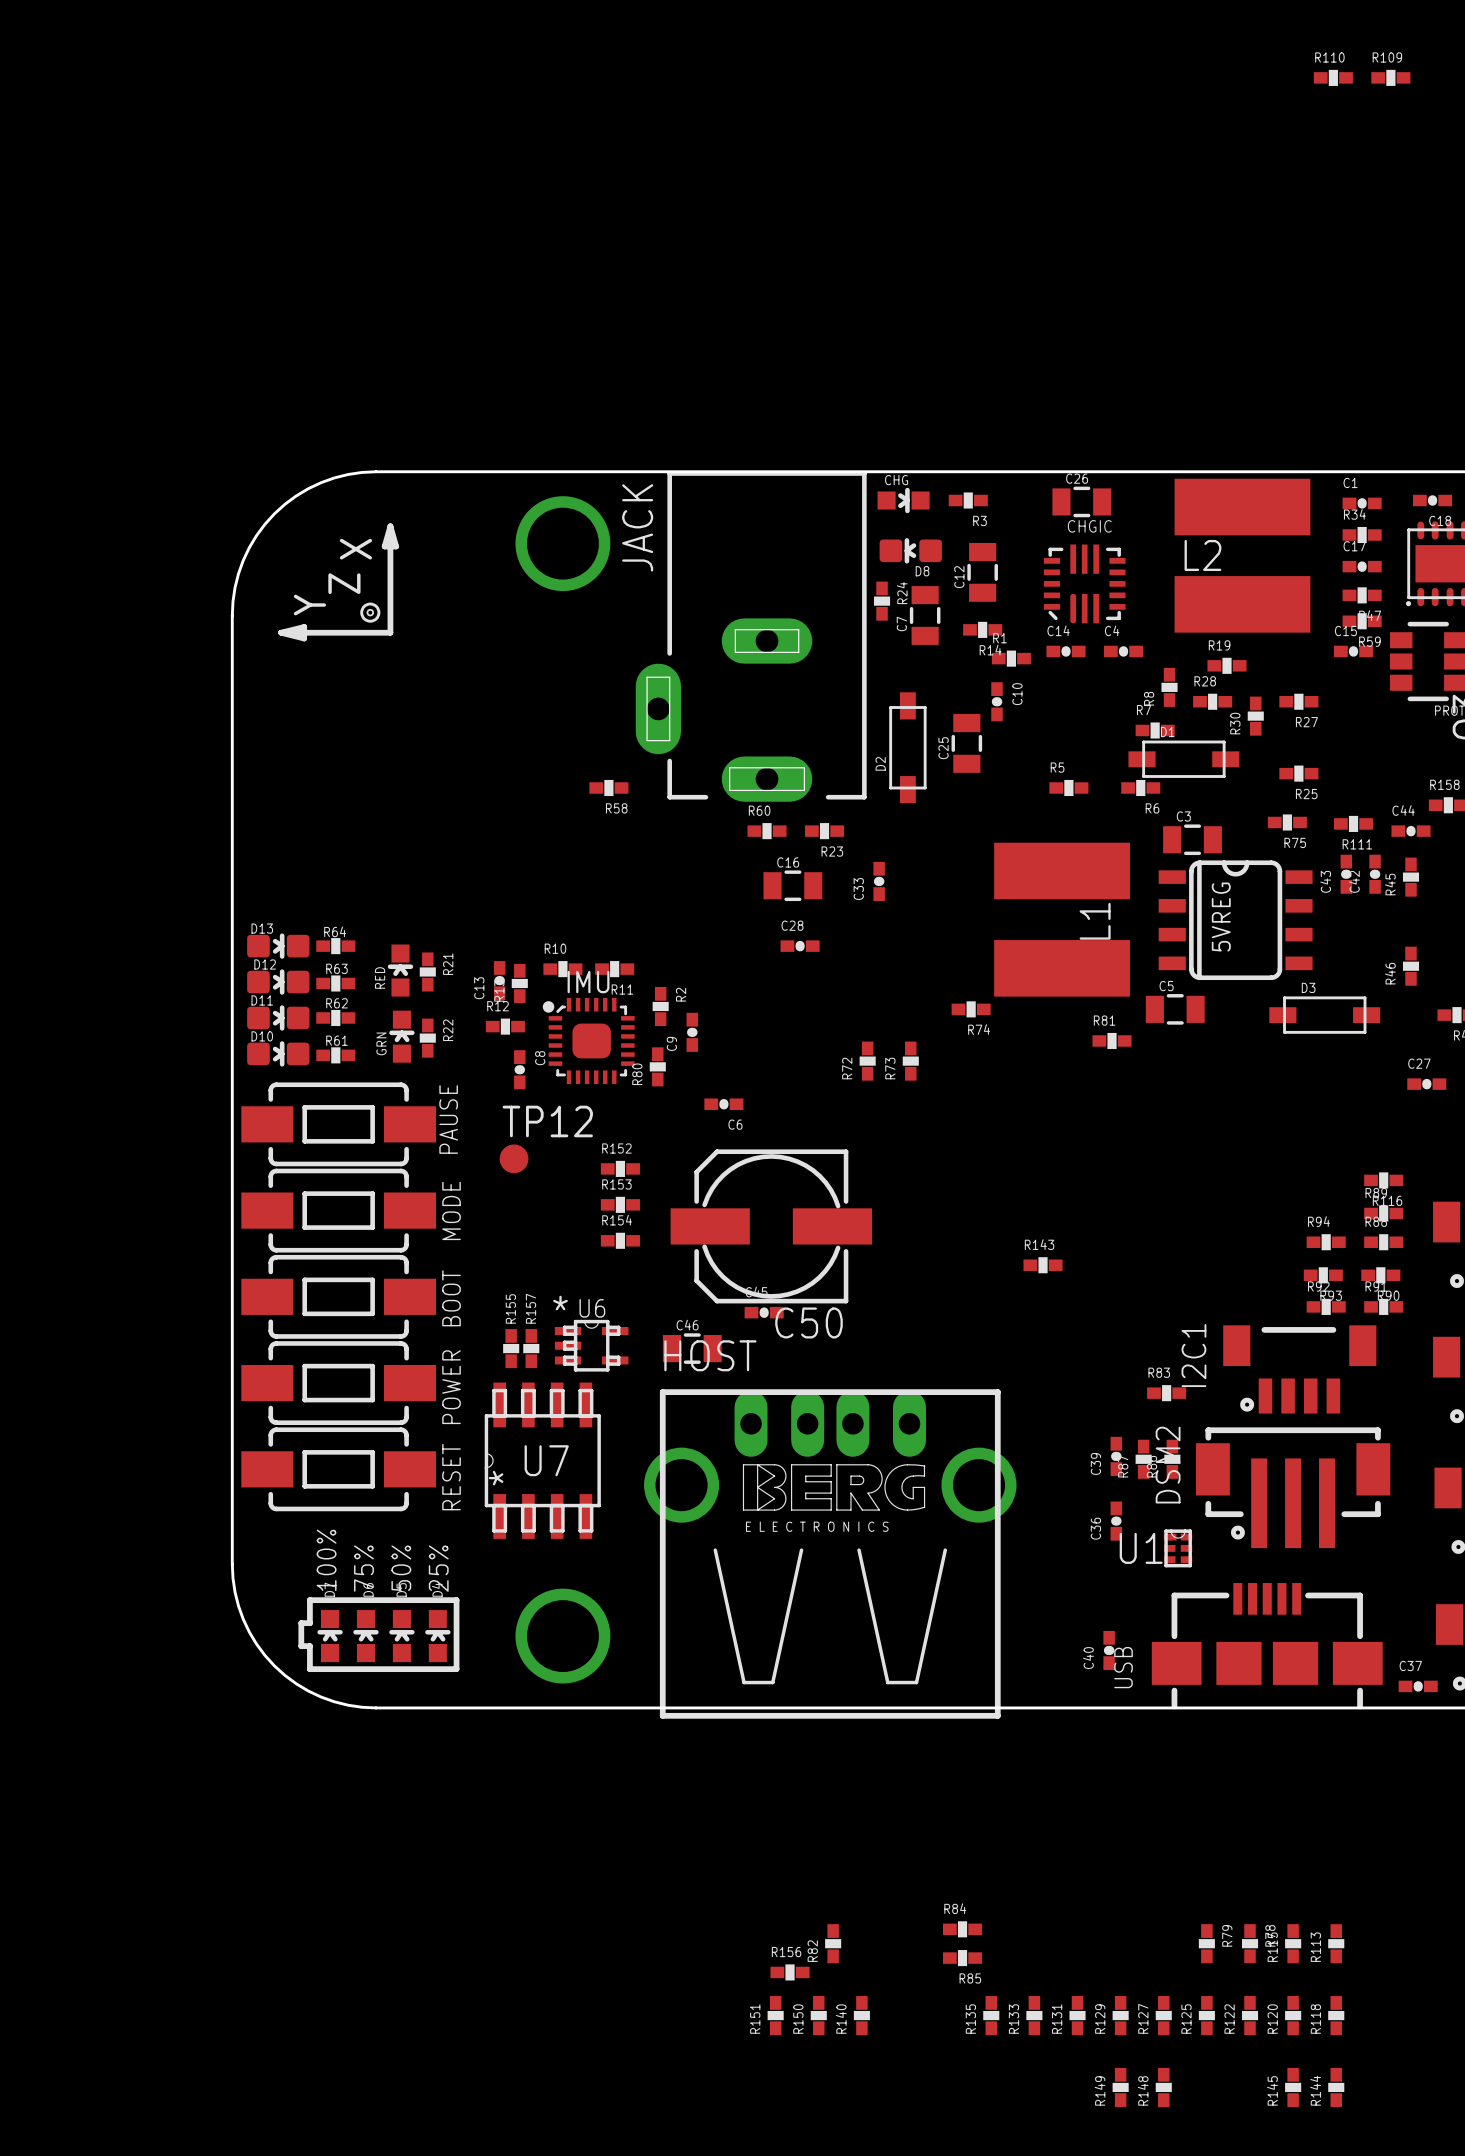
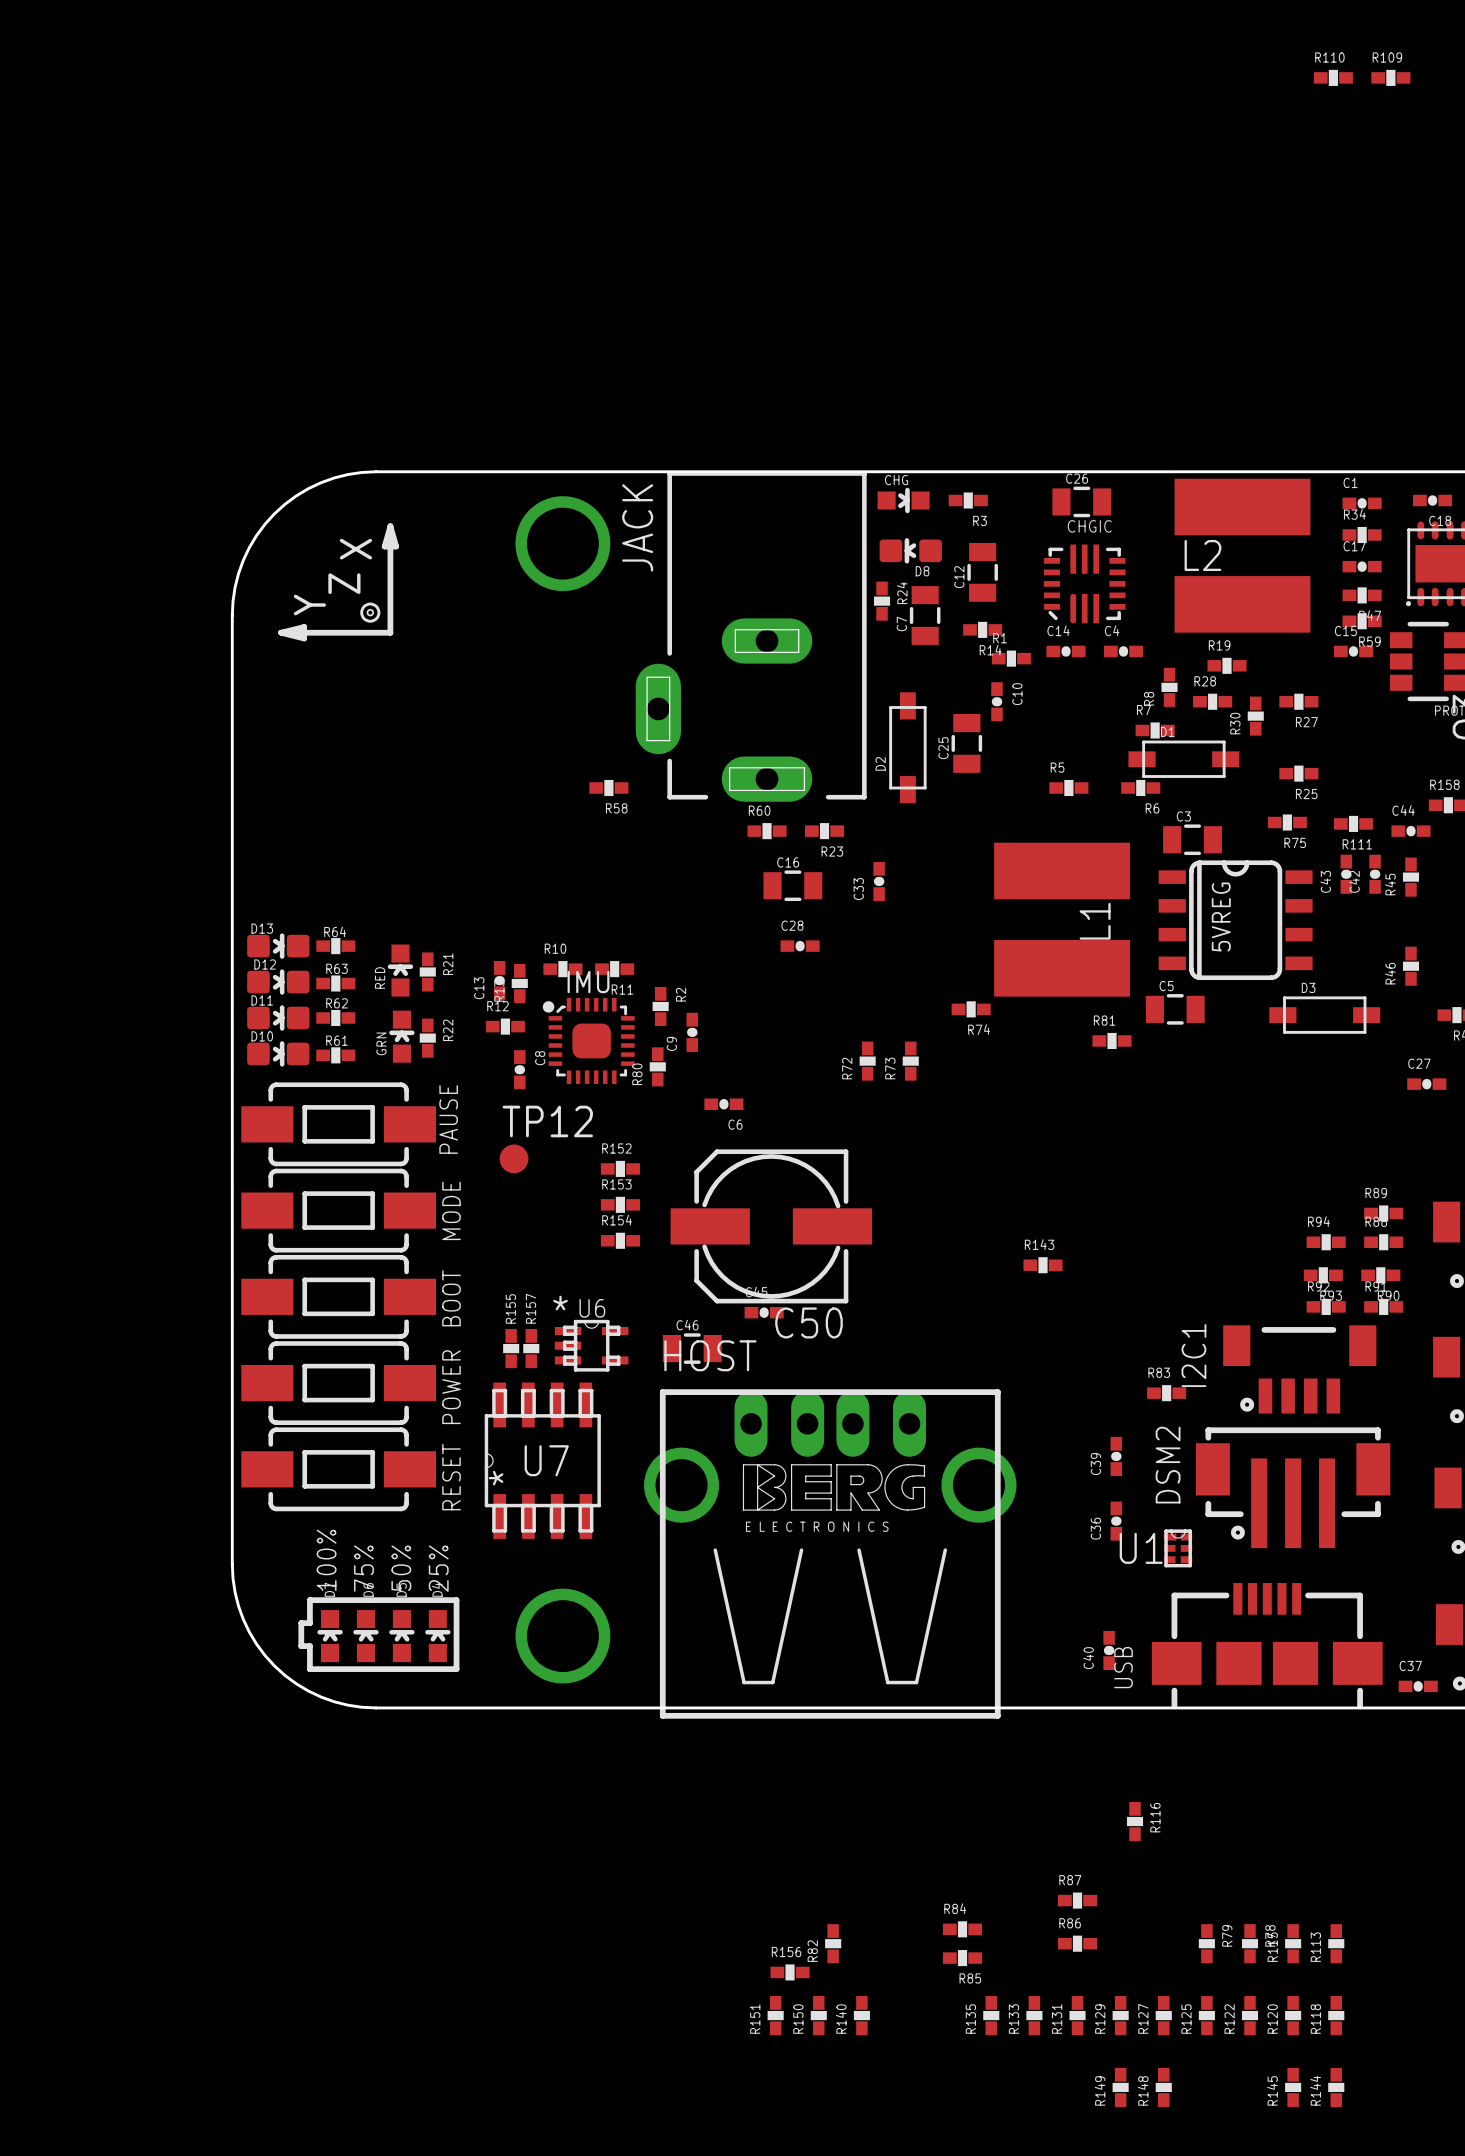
R116 rotation: 0° (1383, 1180) -> 90° clockwise (1135, 1821)
R116 position: (1383, 1180) -> (1135, 1821)
R87 rotation: 0° (1143, 1459) -> 90° clockwise (1077, 1900)
R87 position: (1143, 1459) -> (1077, 1900)
R86 rotation: 0° (1172, 1459) -> 90° clockwise (1077, 1943)
R86 position: (1172, 1459) -> (1077, 1943)

